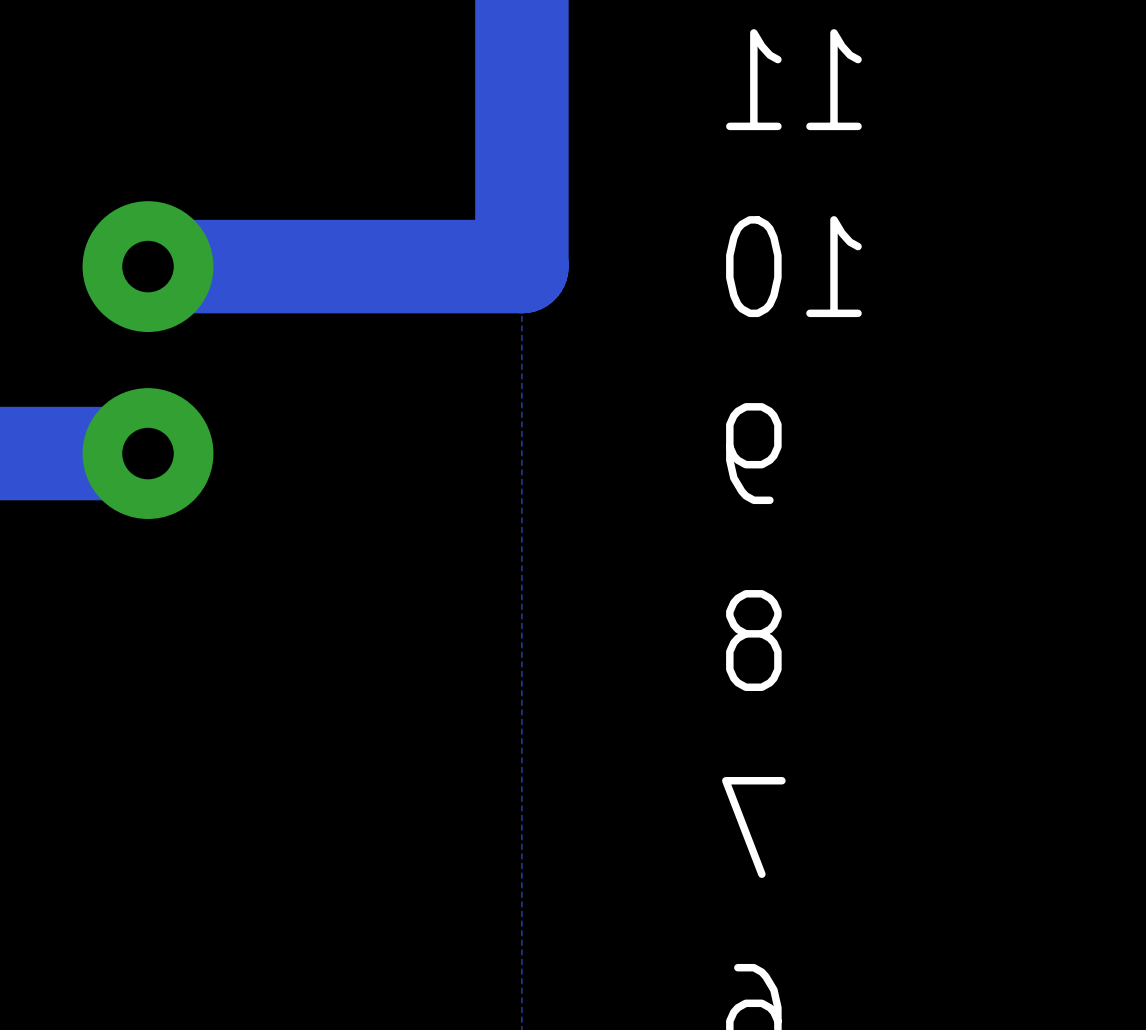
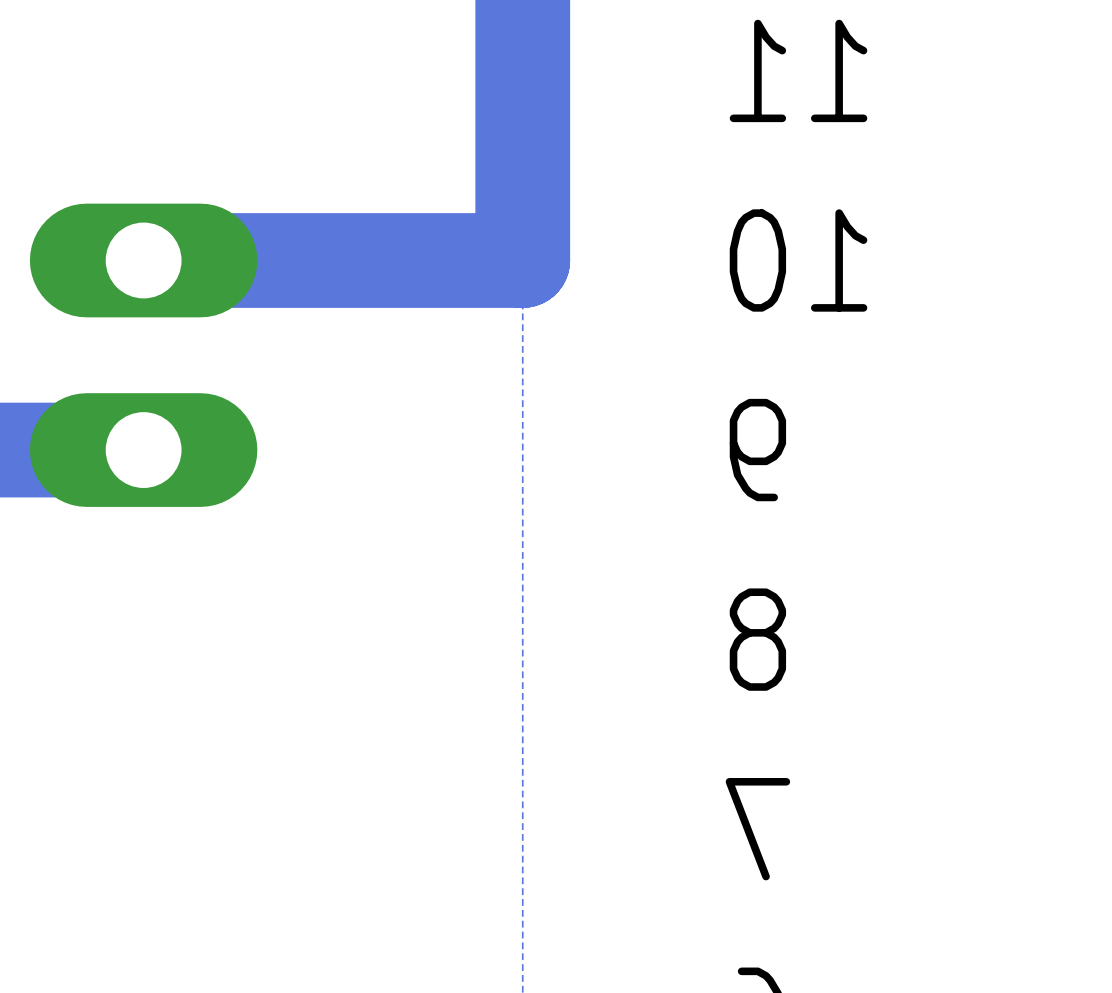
part footprint: [82, 201, 214, 519] -> [29, 203, 258, 507]

